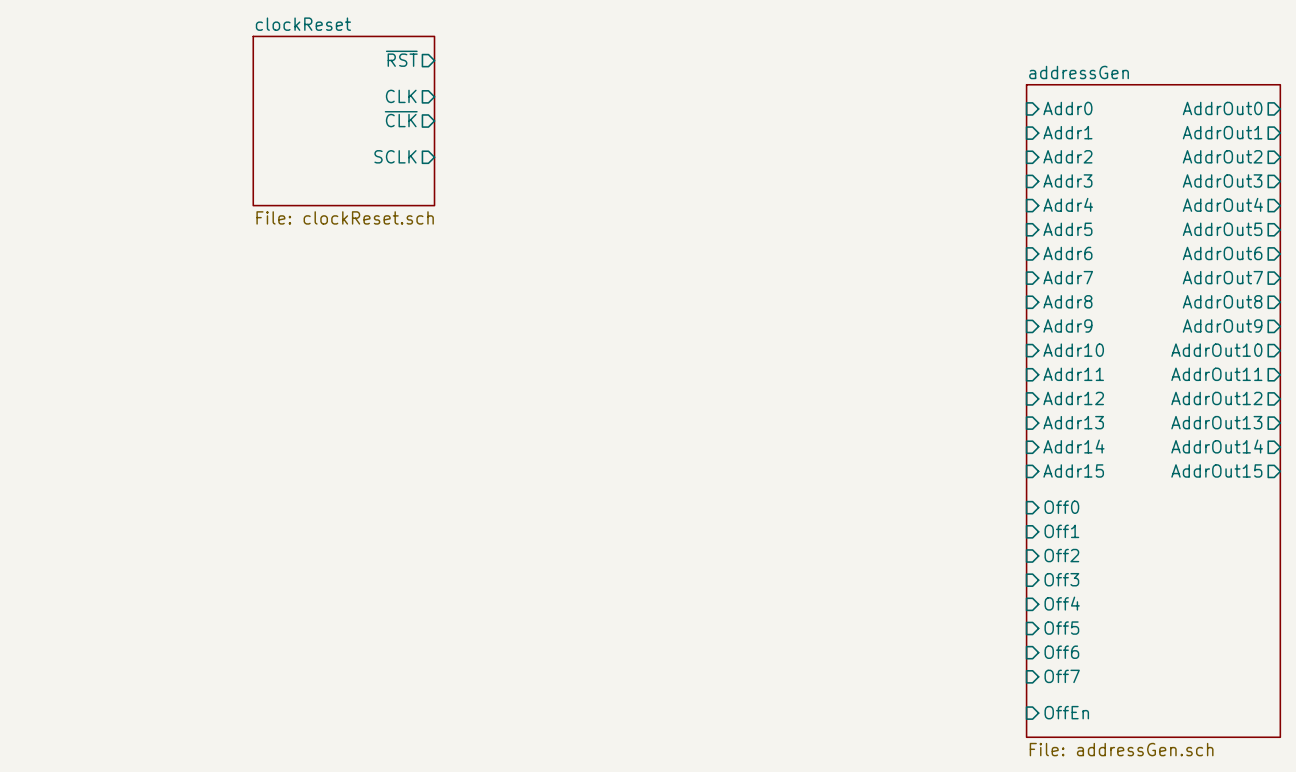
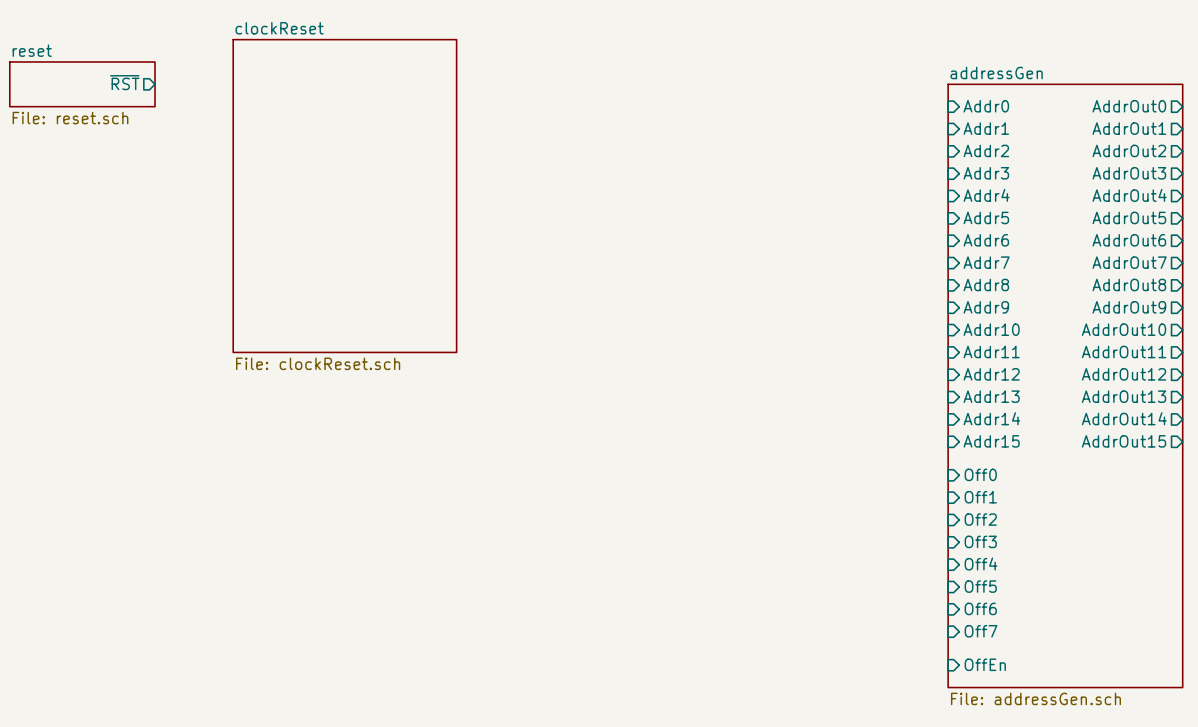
sheet pin: ~{RST} (401, 58) -> none
sheet pin: none -> ~{RST} (124, 82)
sheet reset: none -> File: reset.sch (82, 84)
sheet pin: CLK (401, 96) -> none
sheet pin: ~{CLK} (401, 119) -> none
sheet clockReset: File: clockReset.sch (343, 121) -> none
sheet pin: SCLK (395, 156) -> none
sheet clockReset: none -> File: clockReset.sch (344, 196)

